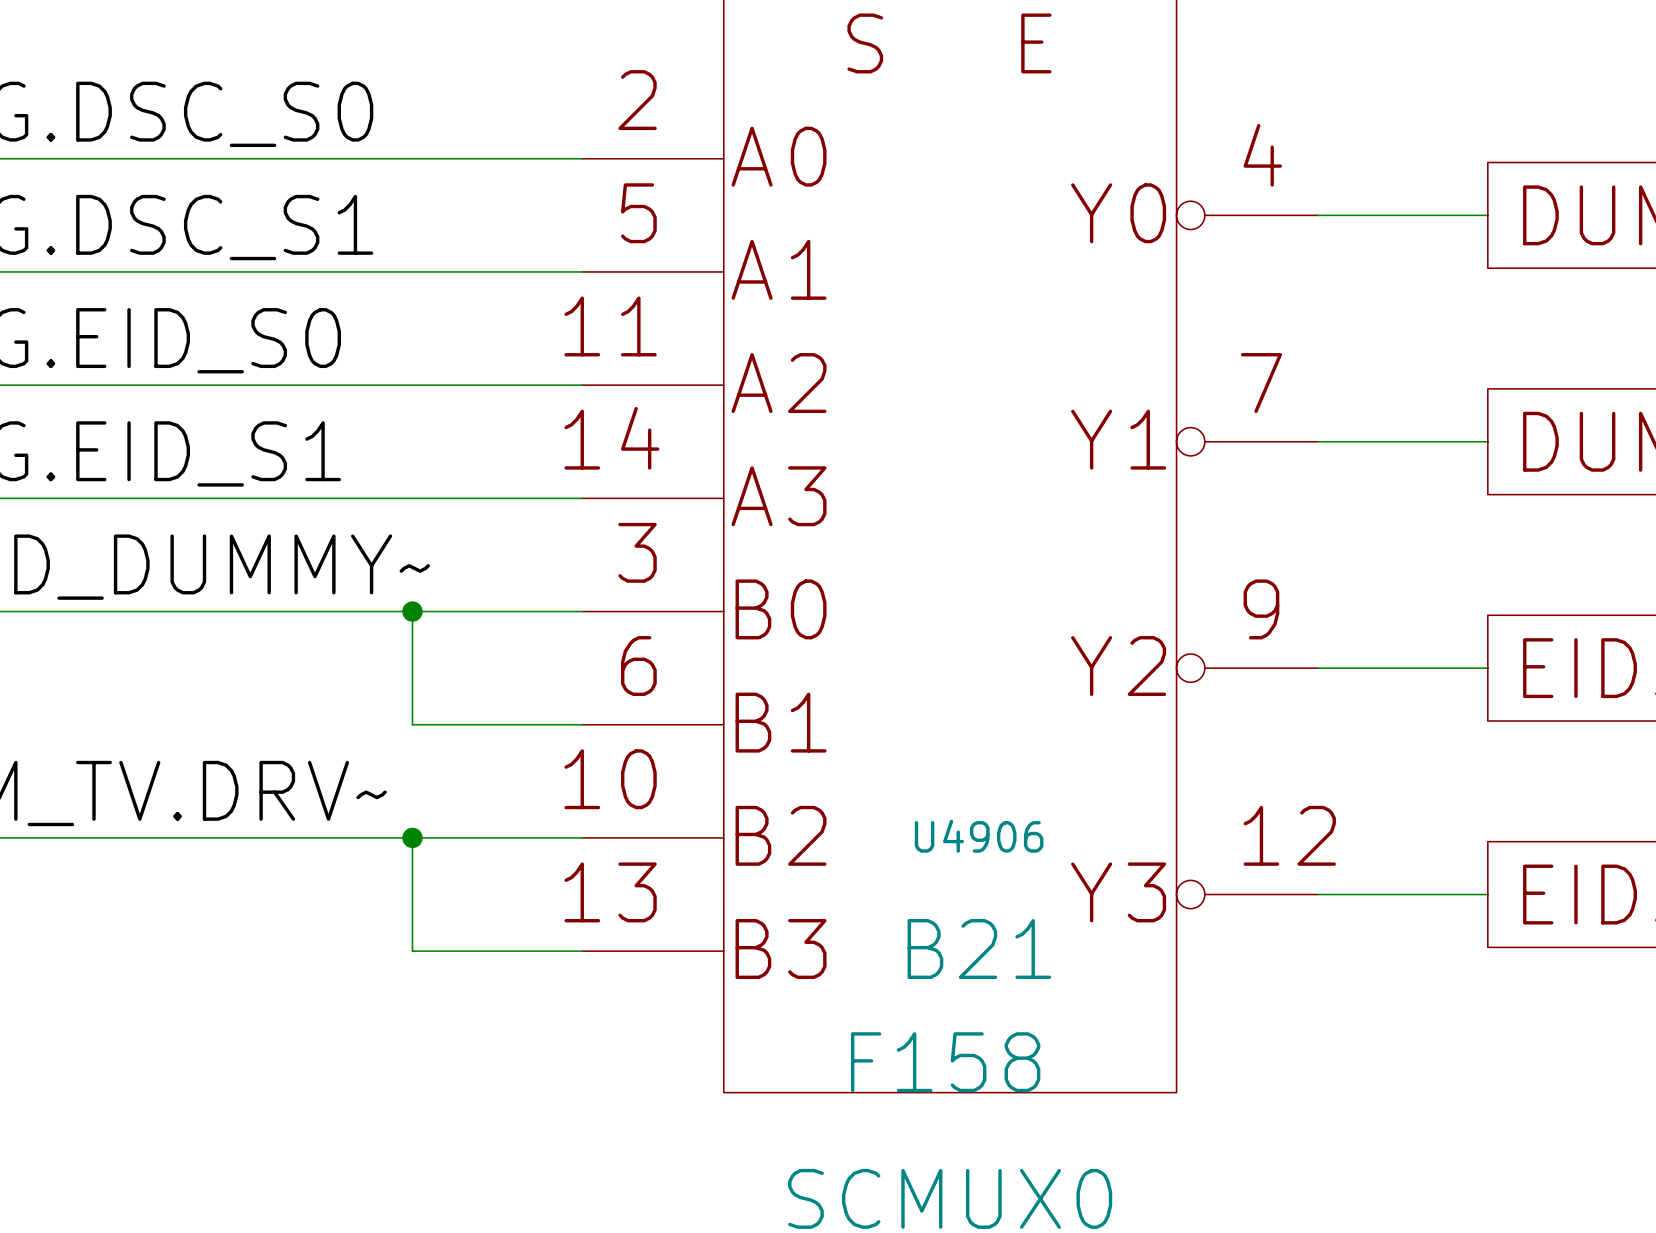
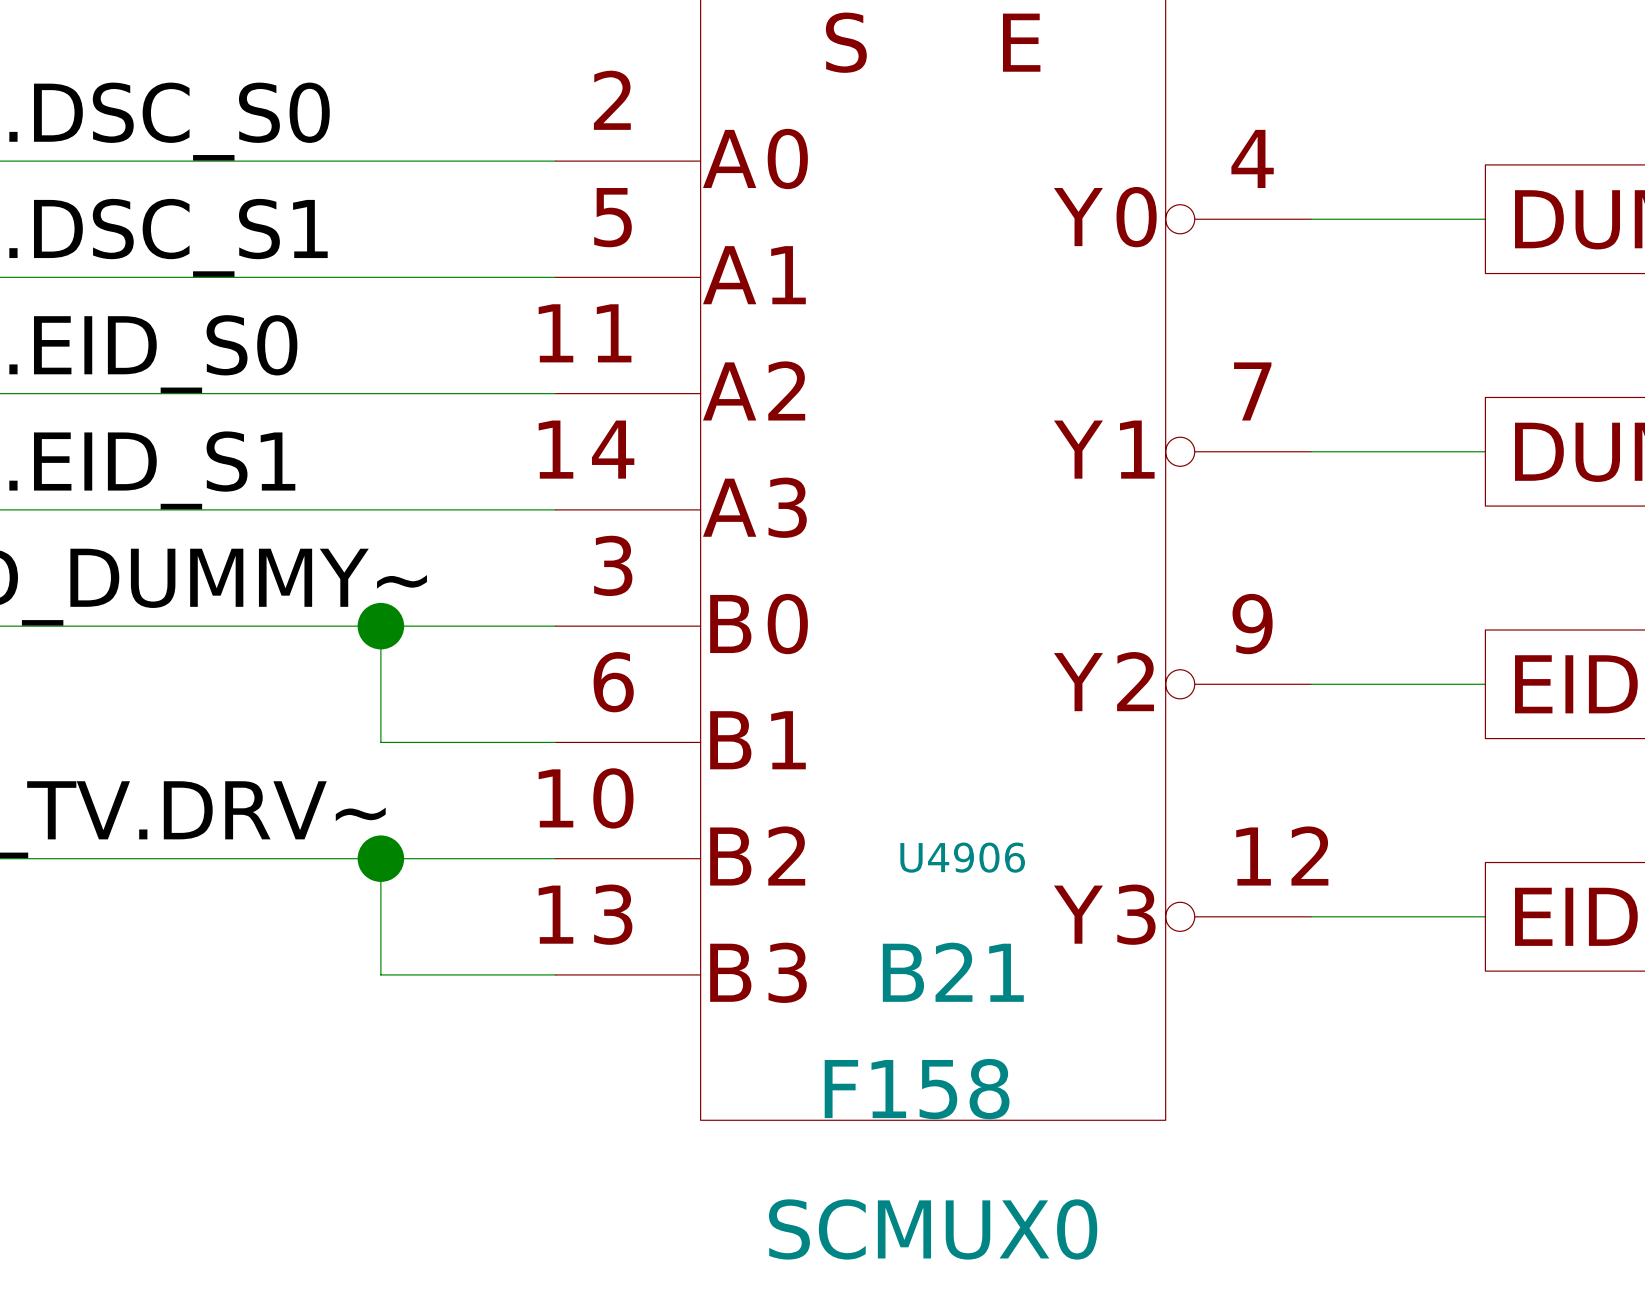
junction size: [402, 601, 423, 622] -> [357, 602, 405, 650]
junction size: [402, 827, 423, 849] -> [357, 835, 405, 882]

